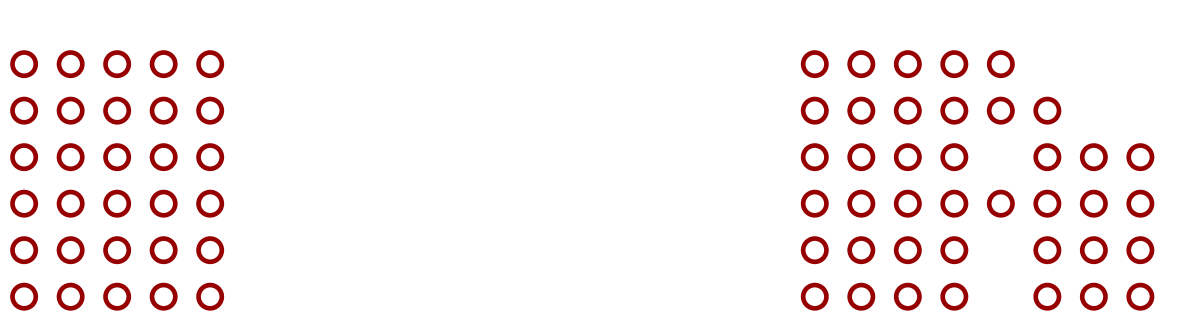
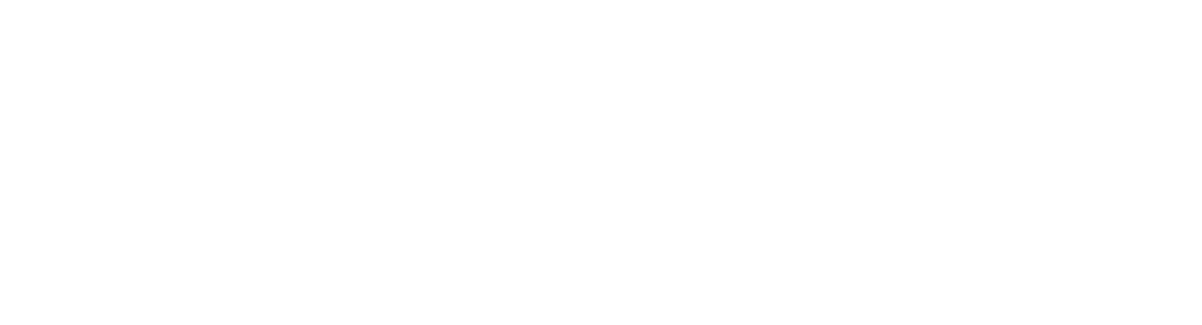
part: (24, 64) -> none
part: (70, 64) -> none
part: (117, 64) -> none
part: (163, 64) -> none
part: (210, 64) -> none
part: (814, 64) -> none
part: (861, 64) -> none
part: (907, 64) -> none
part: (954, 64) -> none
part: (1000, 64) -> none
part: (24, 110) -> none
part: (70, 110) -> none
part: (117, 110) -> none
part: (163, 110) -> none
part: (210, 110) -> none
part: (814, 110) -> none
part: (861, 110) -> none
part: (907, 110) -> none
part: (954, 110) -> none
part: (1000, 110) -> none
part: (1047, 110) -> none
part: (24, 157) -> none
part: (70, 157) -> none
part: (117, 157) -> none
part: (163, 157) -> none
part: (210, 157) -> none
part: (814, 157) -> none
part: (861, 157) -> none
part: (907, 157) -> none
part: (954, 157) -> none
part: (1047, 157) -> none
part: (1093, 157) -> none
part: (1140, 157) -> none
part: (24, 203) -> none
part: (70, 203) -> none
part: (117, 203) -> none
part: (163, 203) -> none
part: (210, 203) -> none
part: (814, 203) -> none
part: (861, 203) -> none
part: (907, 203) -> none
part: (954, 203) -> none
part: (1000, 203) -> none
part: (1047, 203) -> none
part: (1093, 203) -> none
part: (1140, 203) -> none
part: (24, 250) -> none
part: (70, 250) -> none
part: (117, 250) -> none
part: (163, 250) -> none
part: (210, 250) -> none
part: (814, 250) -> none
part: (861, 250) -> none
part: (907, 250) -> none
part: (954, 250) -> none
part: (1047, 250) -> none
part: (1093, 250) -> none
part: (1140, 250) -> none
part: (24, 296) -> none
part: (70, 296) -> none
part: (117, 296) -> none
part: (163, 296) -> none
part: (210, 296) -> none
part: (814, 296) -> none
part: (861, 296) -> none
part: (907, 296) -> none
part: (954, 296) -> none
part: (1047, 296) -> none
part: (1093, 296) -> none
part: (1140, 296) -> none

